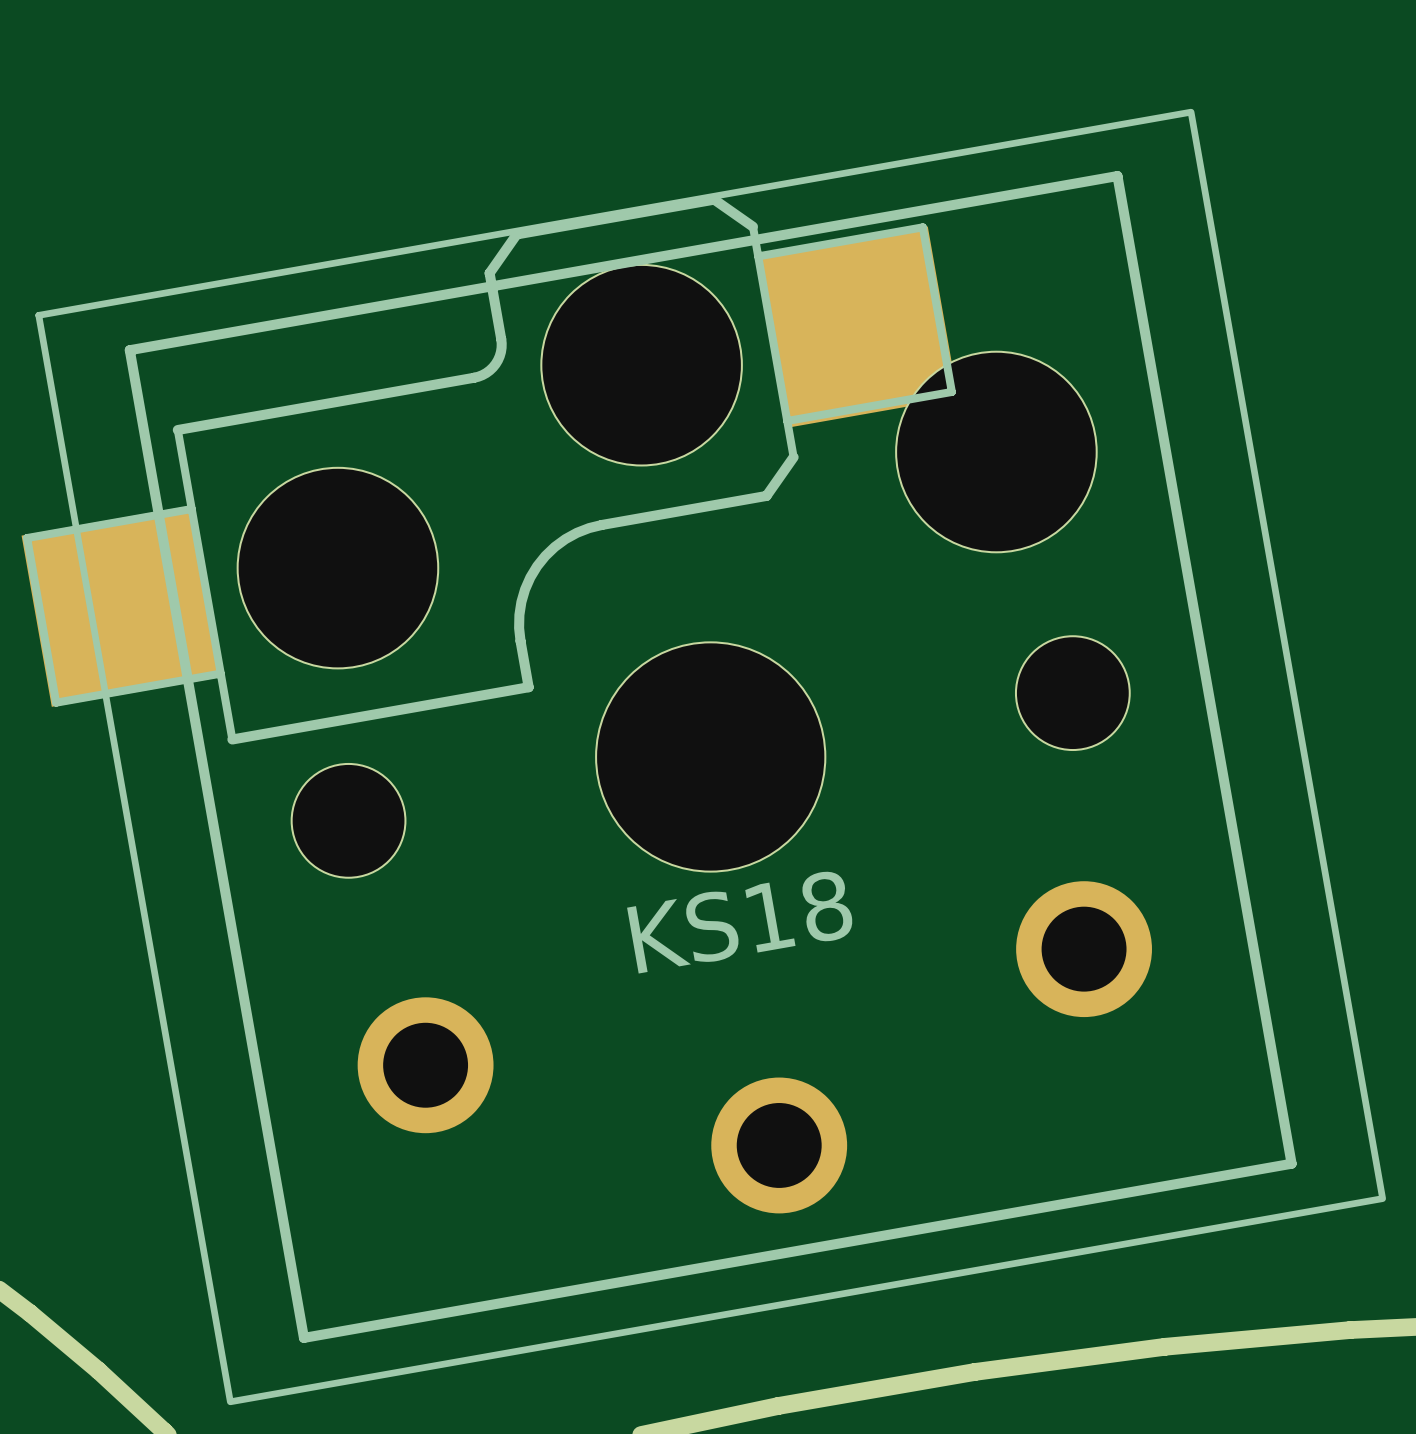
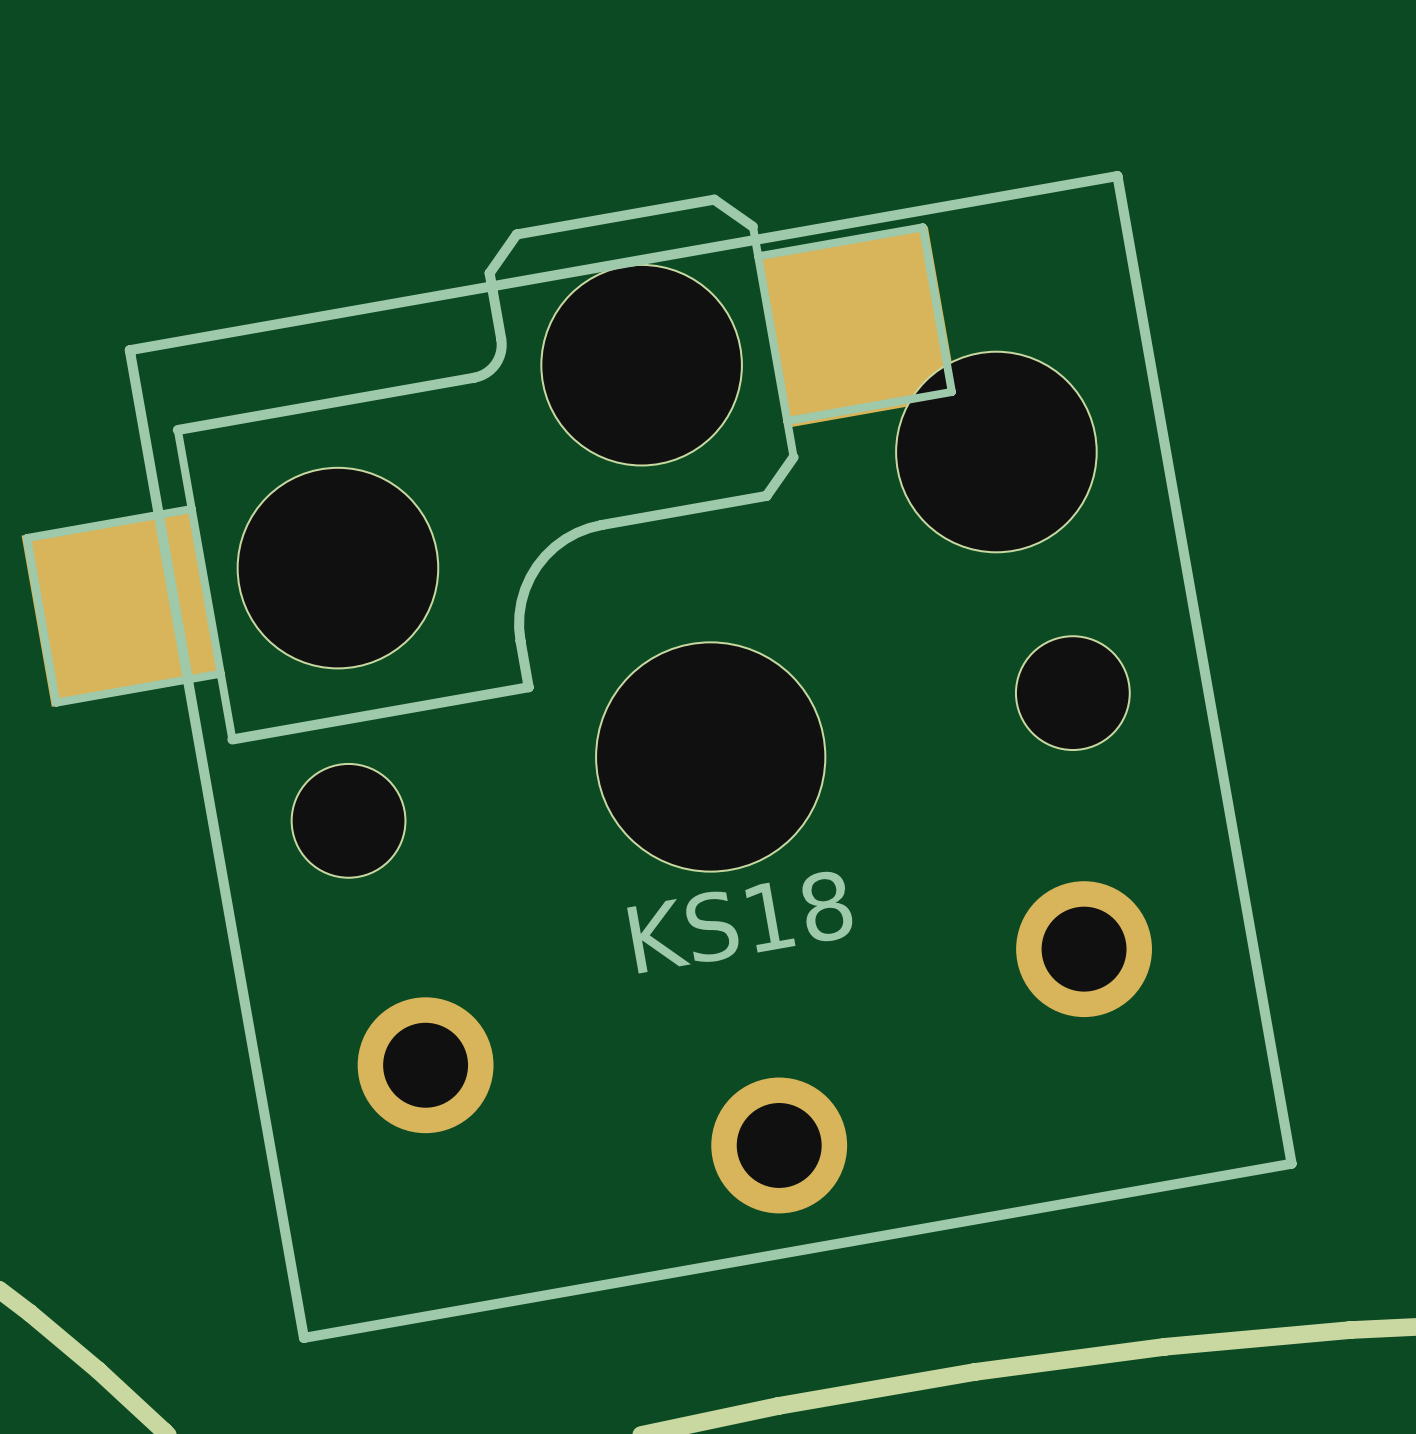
KS18 footprint: [21, 108, 1386, 1406] -> [21, 171, 1297, 1343]

